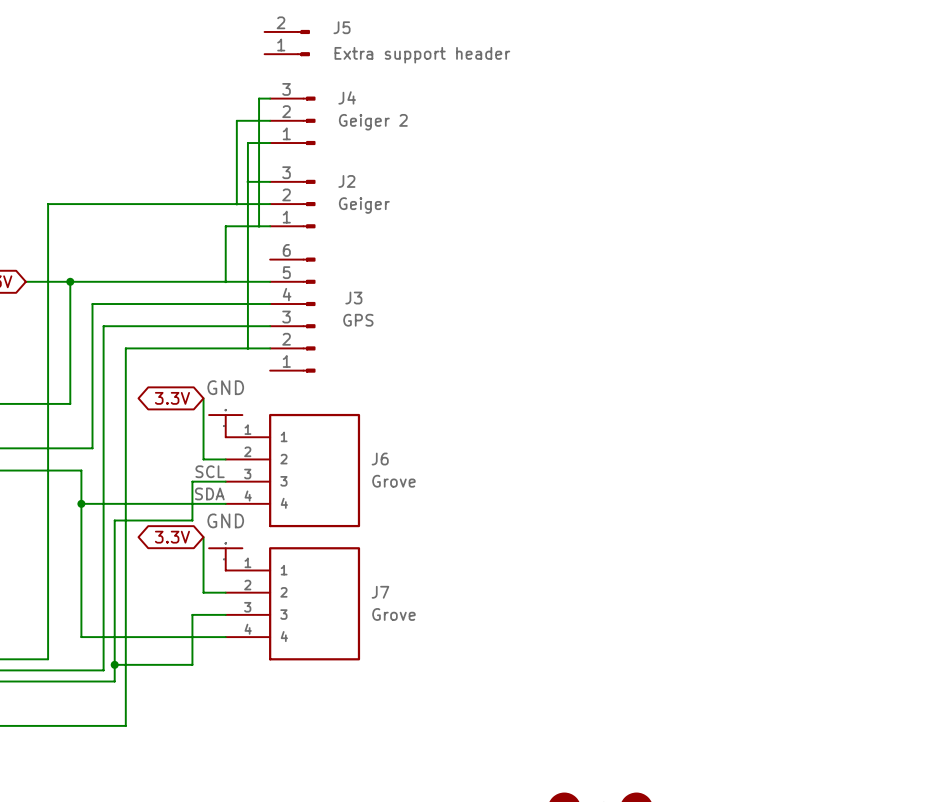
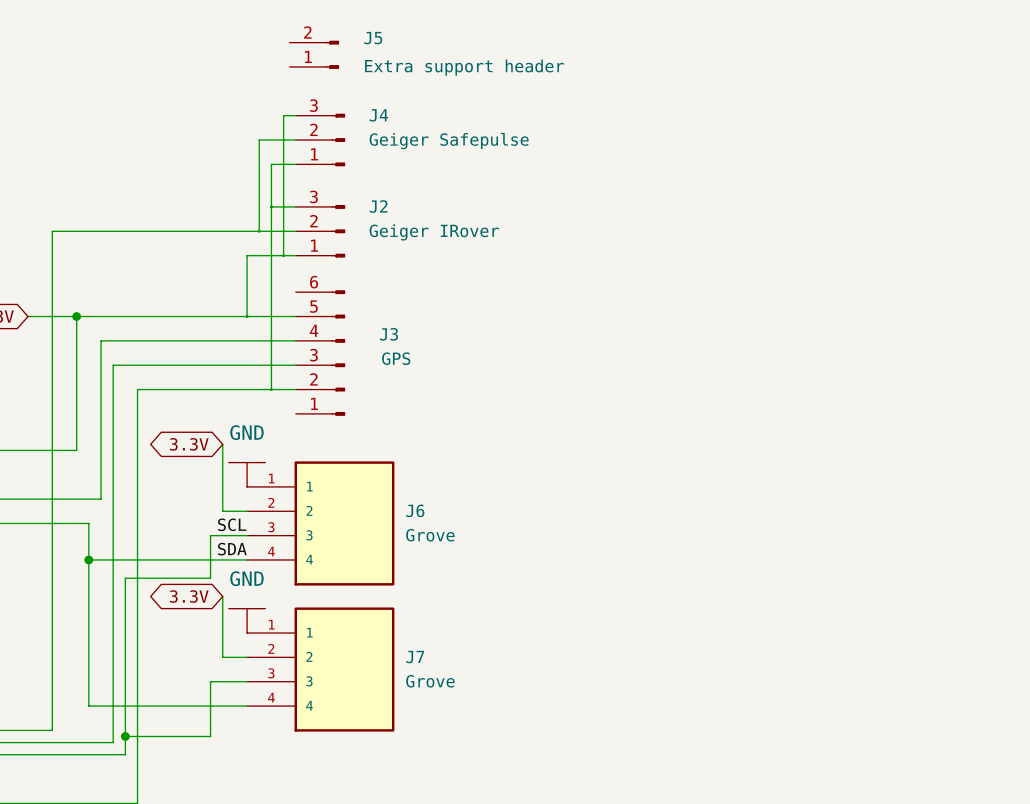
J4 value: Geiger 2 (373, 122) -> Geiger Safepulse (449, 141)
J2 value: Geiger (364, 205) -> Geiger IRover (434, 232)

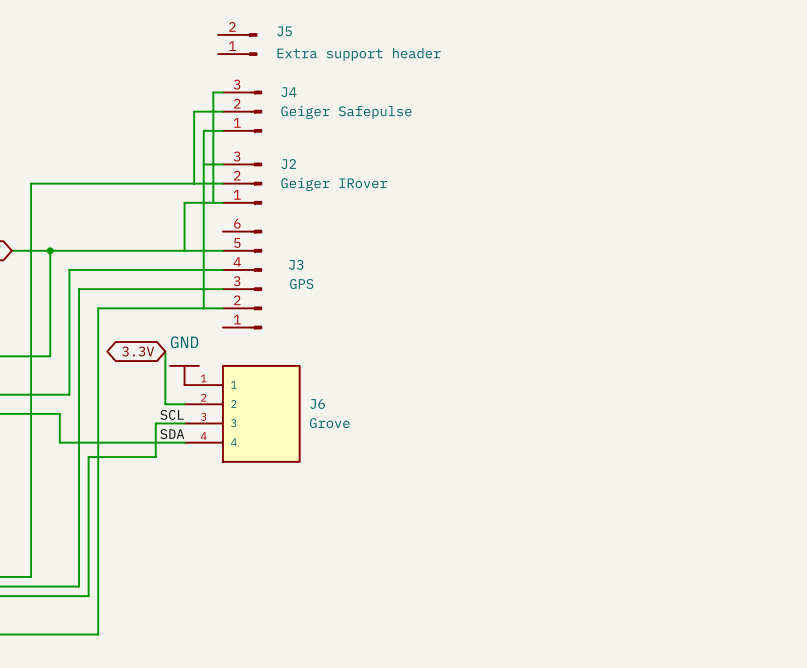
wire: (88, 559) (88, 706) (247, 706) -> none
junction: (88, 559) -> none
global label: 3.3V (189, 596) -> none
wire: (222, 596) (222, 657) (247, 657) -> none
power symbol: GND (247, 620) -> none
J7: Grove (320, 669) -> none
wire: (247, 681) (210, 681) (210, 736) (125, 736) -> none
junction: (125, 736) -> none

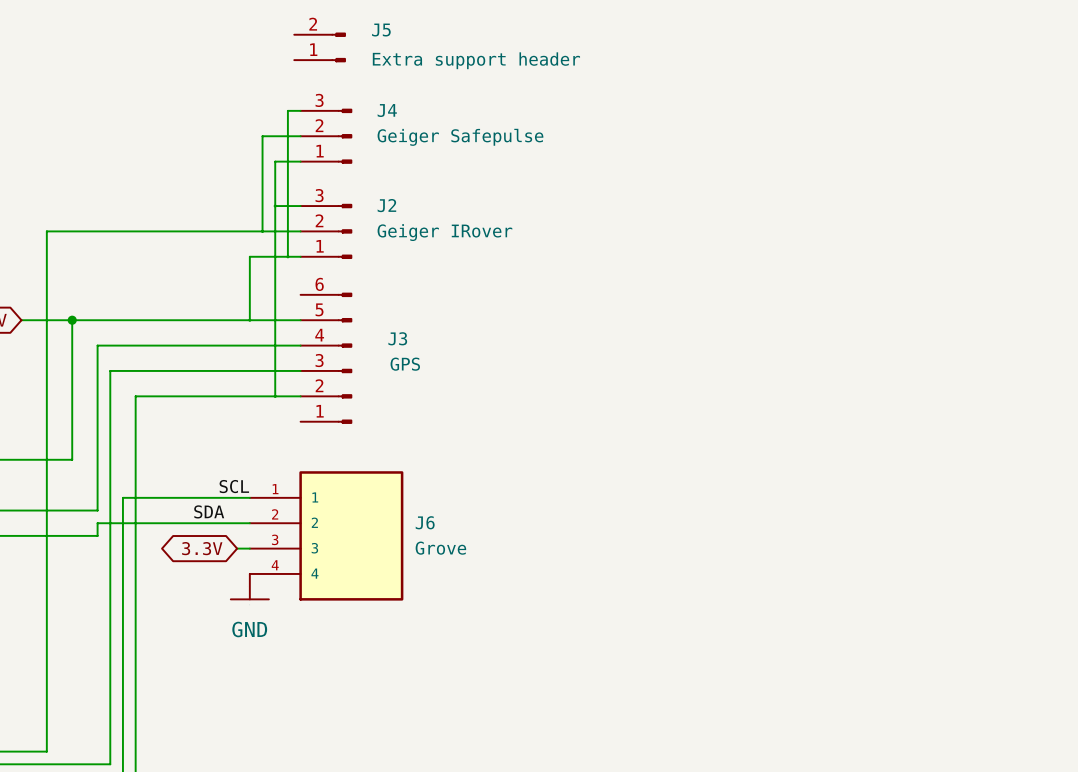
global label position: 3.3V (138, 351) -> 3.3V (202, 548)
wire: (165, 351) (165, 404) -> none
power symbol rotation: 0° (184, 365) -> 180° (249, 599)
power symbol position: GND (184, 375) -> GND (249, 586)
wire: (59, 413) (59, 442) (184, 442) -> (84, 535) (97, 535) (97, 523) (224, 523)
label position: SCL (172, 414) -> SCL (234, 486)
wire: (174, 423) (155, 423) (155, 457) (88, 457) -> (249, 497) (122, 497) (122, 593)
label position: SDA (172, 434) -> SDA (209, 511)

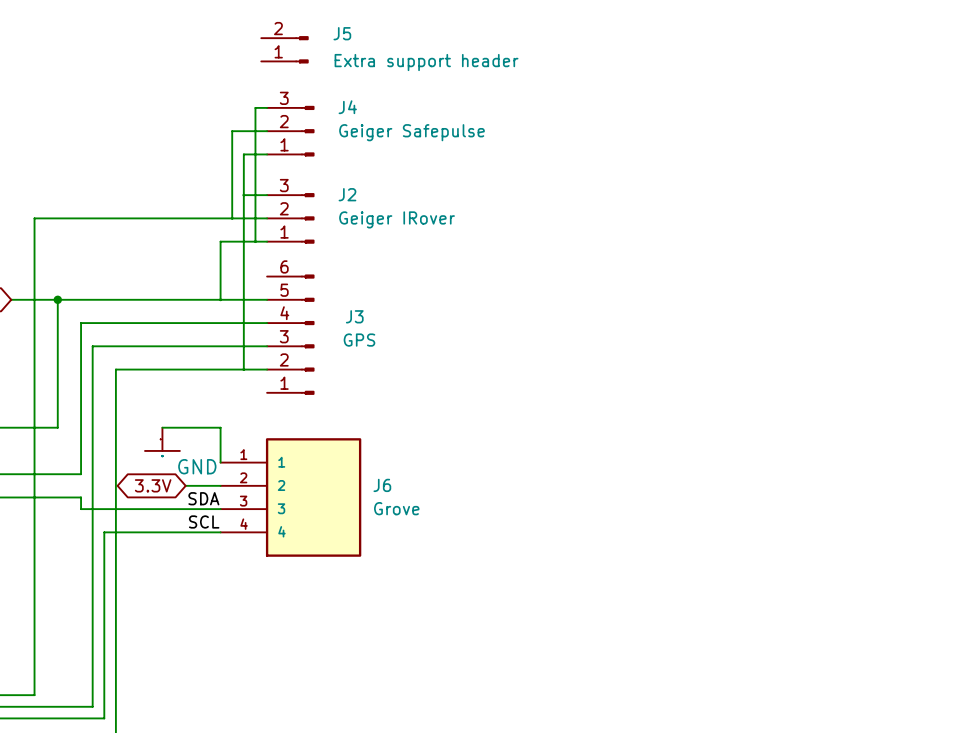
wire: none -> (162, 427) (220, 427) (220, 462)
label position: SCL (234, 486) -> SCL (204, 521)
wire: (249, 497) (122, 497) (122, 573) -> (220, 532) (104, 532)
label position: SDA (209, 511) -> SDA (203, 498)
wire: (211, 523) (97, 523) (97, 535) -> (208, 509) (81, 509) (81, 497)
global label position: 3.3V (202, 548) -> 3.3V (153, 485)
power symbol position: GND (249, 586) -> GND (162, 439)
power symbol text position: GND (249, 629) -> GND (197, 466)

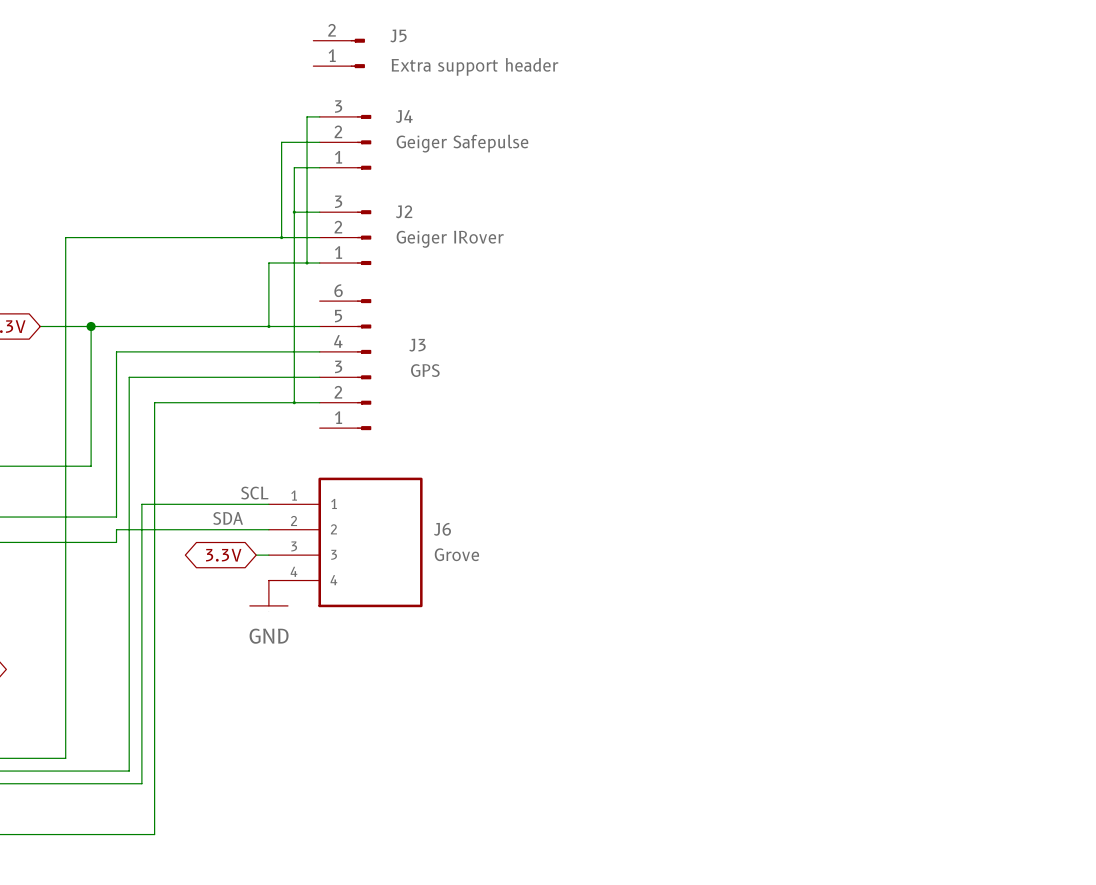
wire: (162, 427) (220, 427) (220, 462) -> none
power symbol position: GND (162, 439) -> GND (268, 593)
power symbol text position: GND (197, 466) -> GND (269, 636)
global label position: 3.3V (153, 485) -> 3.3V (223, 555)
wire: (81, 497) (81, 509) (208, 509) -> (116, 542) (116, 529) (230, 529)
label position: SDA (203, 498) -> SDA (228, 518)
label position: SCL (204, 521) -> SCL (254, 493)
wire: (104, 532) (220, 532) -> (141, 580) (141, 504) (268, 504)

